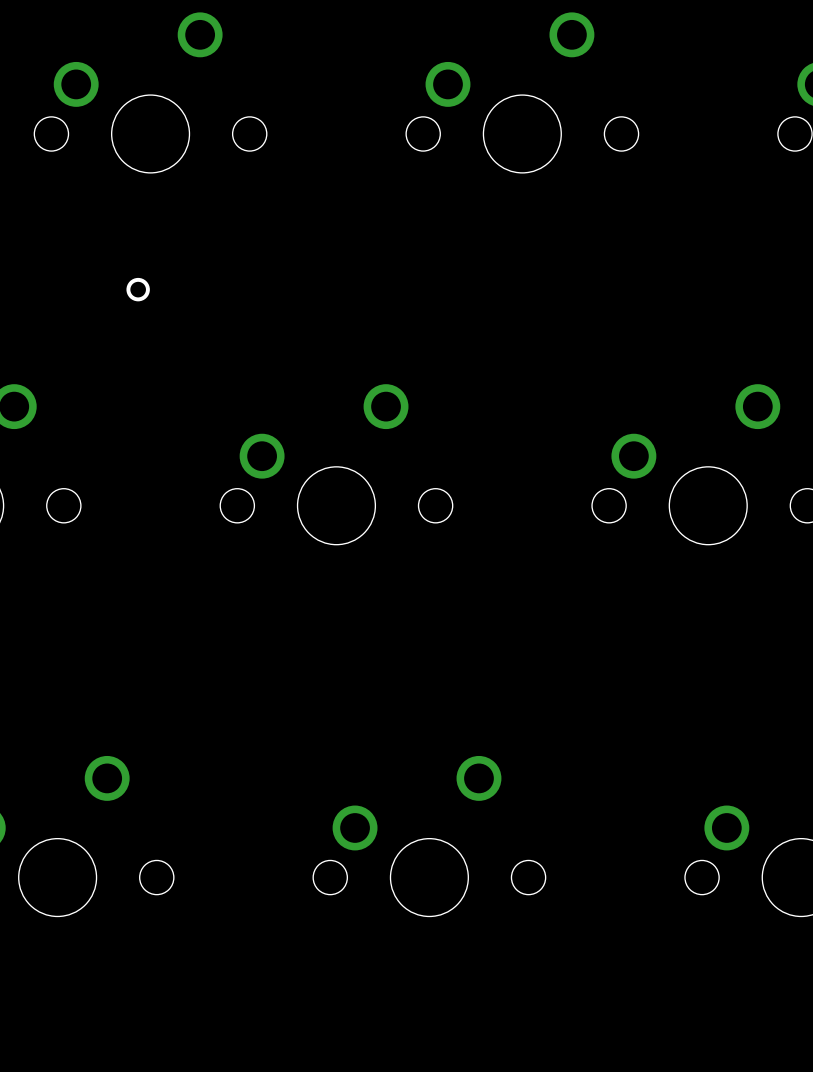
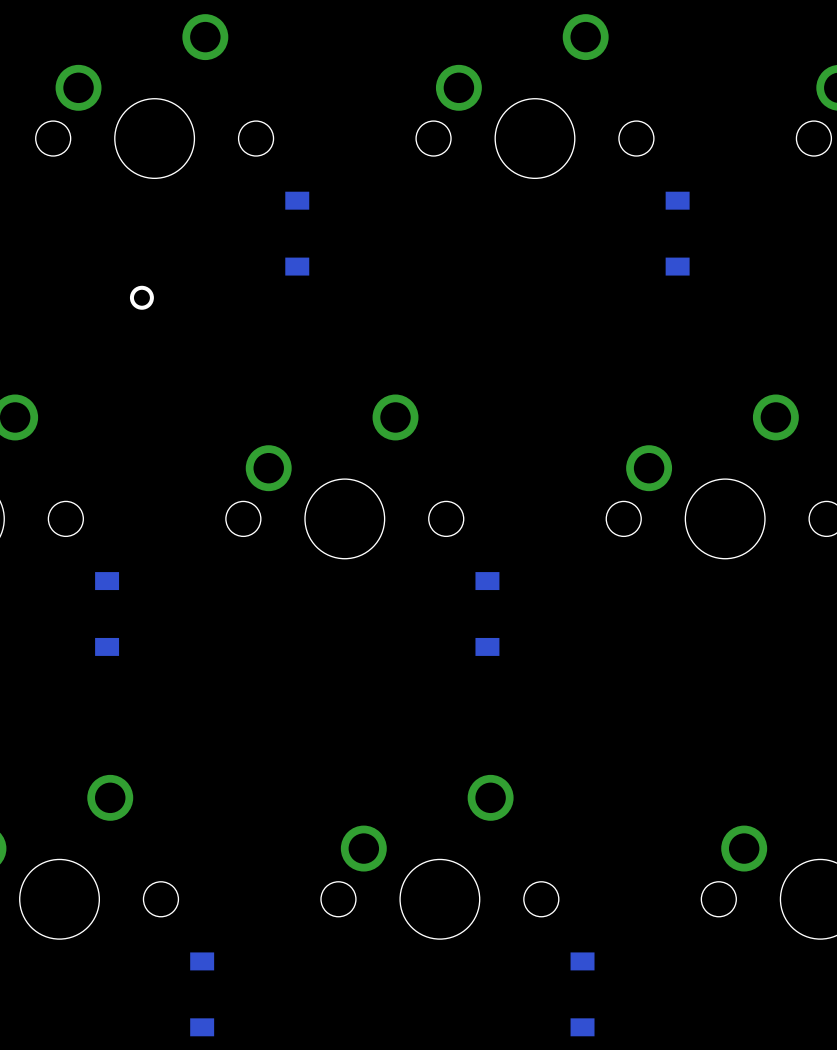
part: none -> (297, 233)
part: none -> (677, 233)
part: none -> (107, 614)
part: none -> (487, 614)
part: none -> (202, 994)
part: none -> (582, 994)

